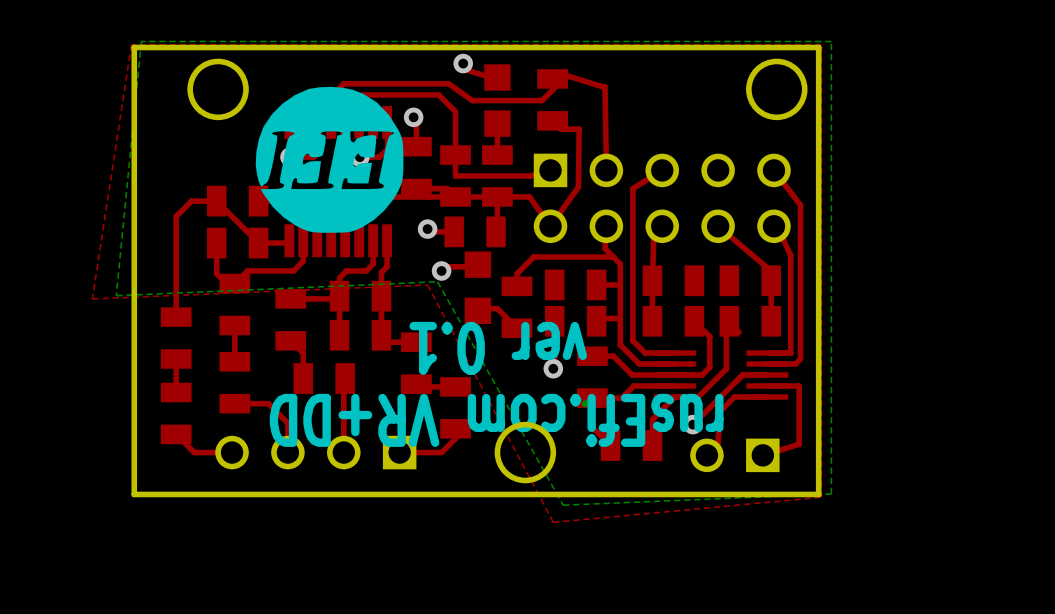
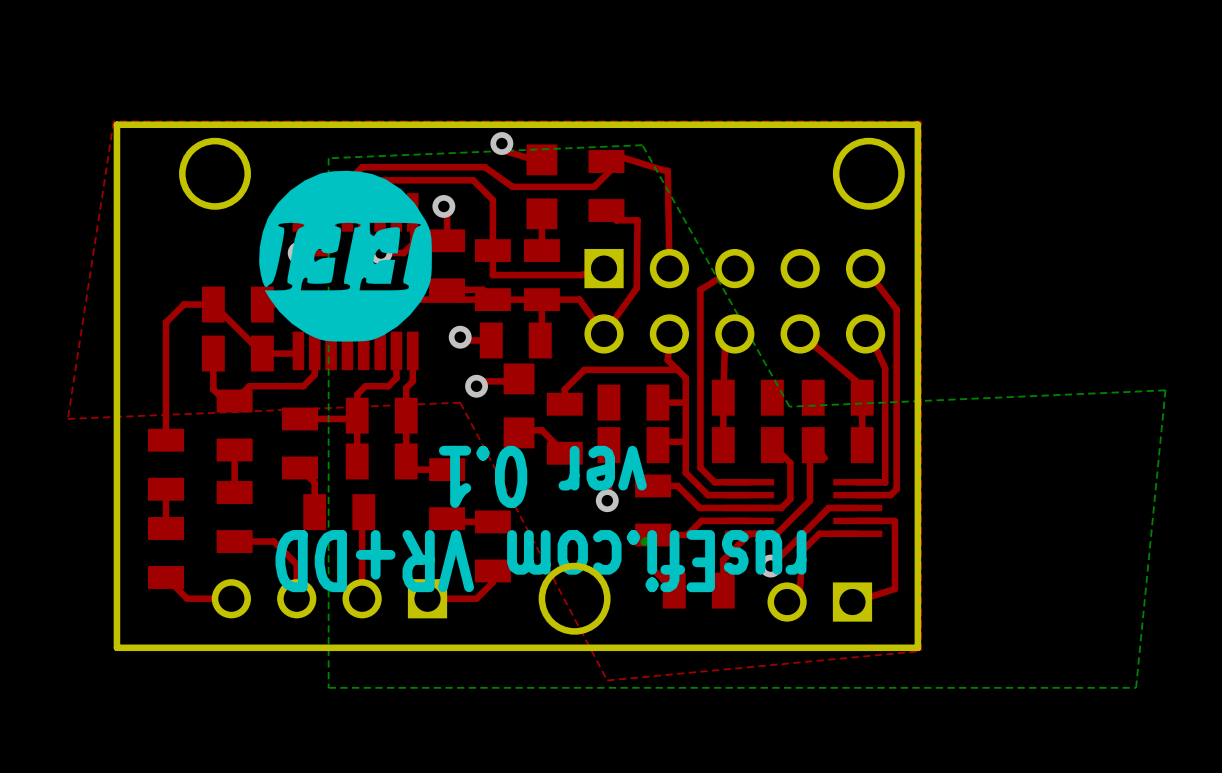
bottom zone outline: (831, 41) (141, 41) (116, 295) (437, 281) (563, 505) (831, 494) (831, 41) -> (642, 145) (789, 406) (1165, 390) (1136, 687) (328, 687) (328, 158) (642, 145)

